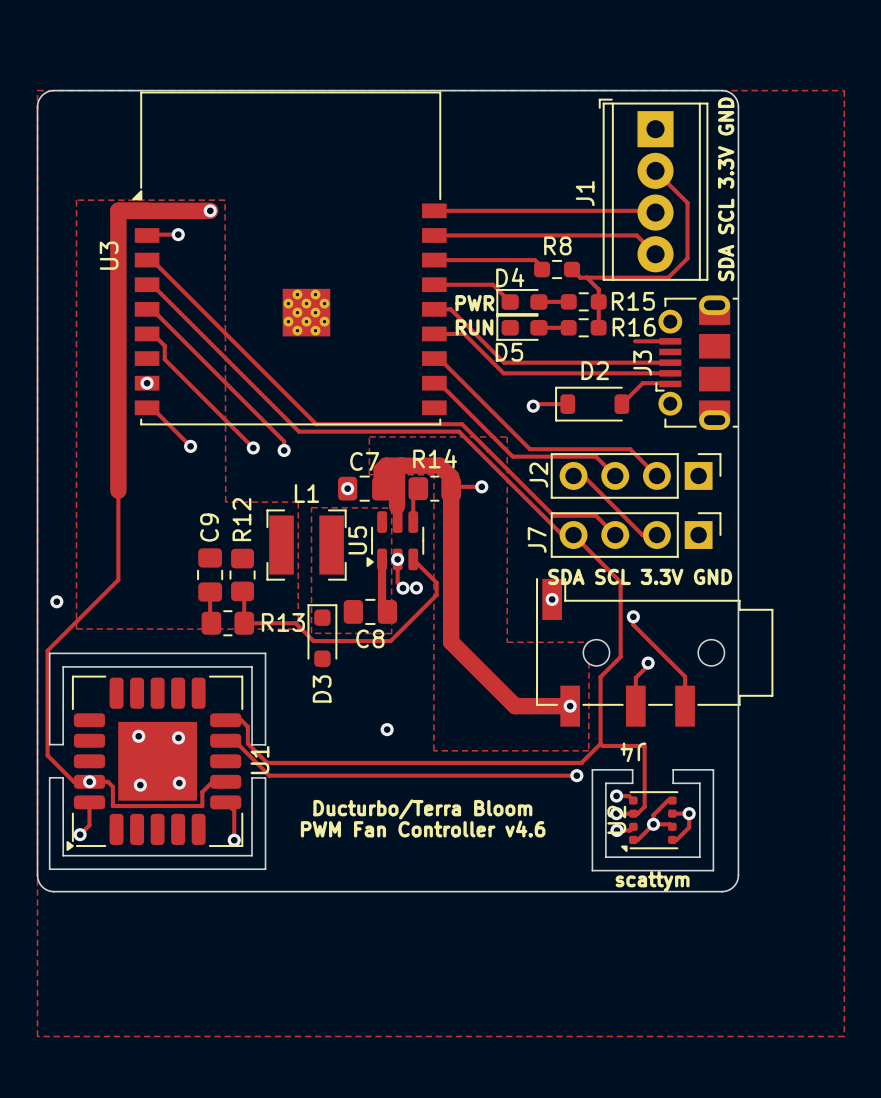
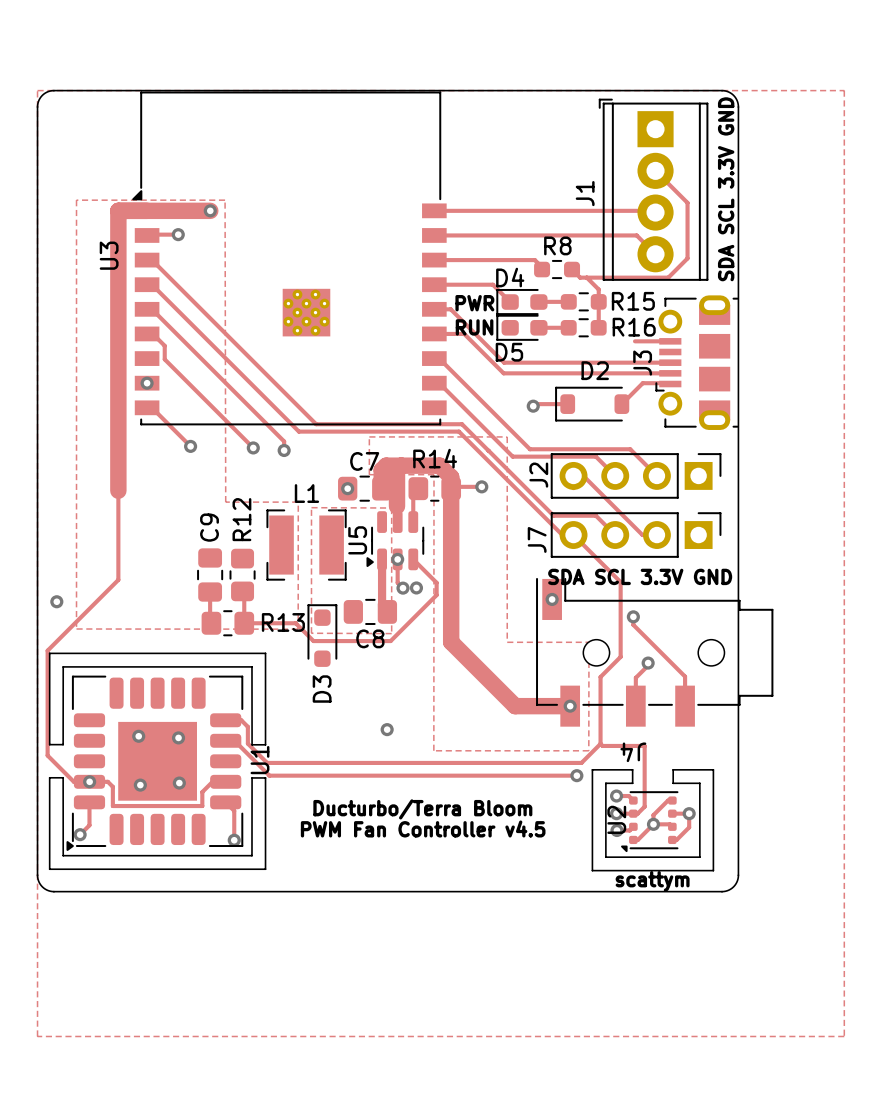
text: PWM Fan Controller v4.6 (423, 828) -> PWM Fan Controller v4.5 (423, 828)

